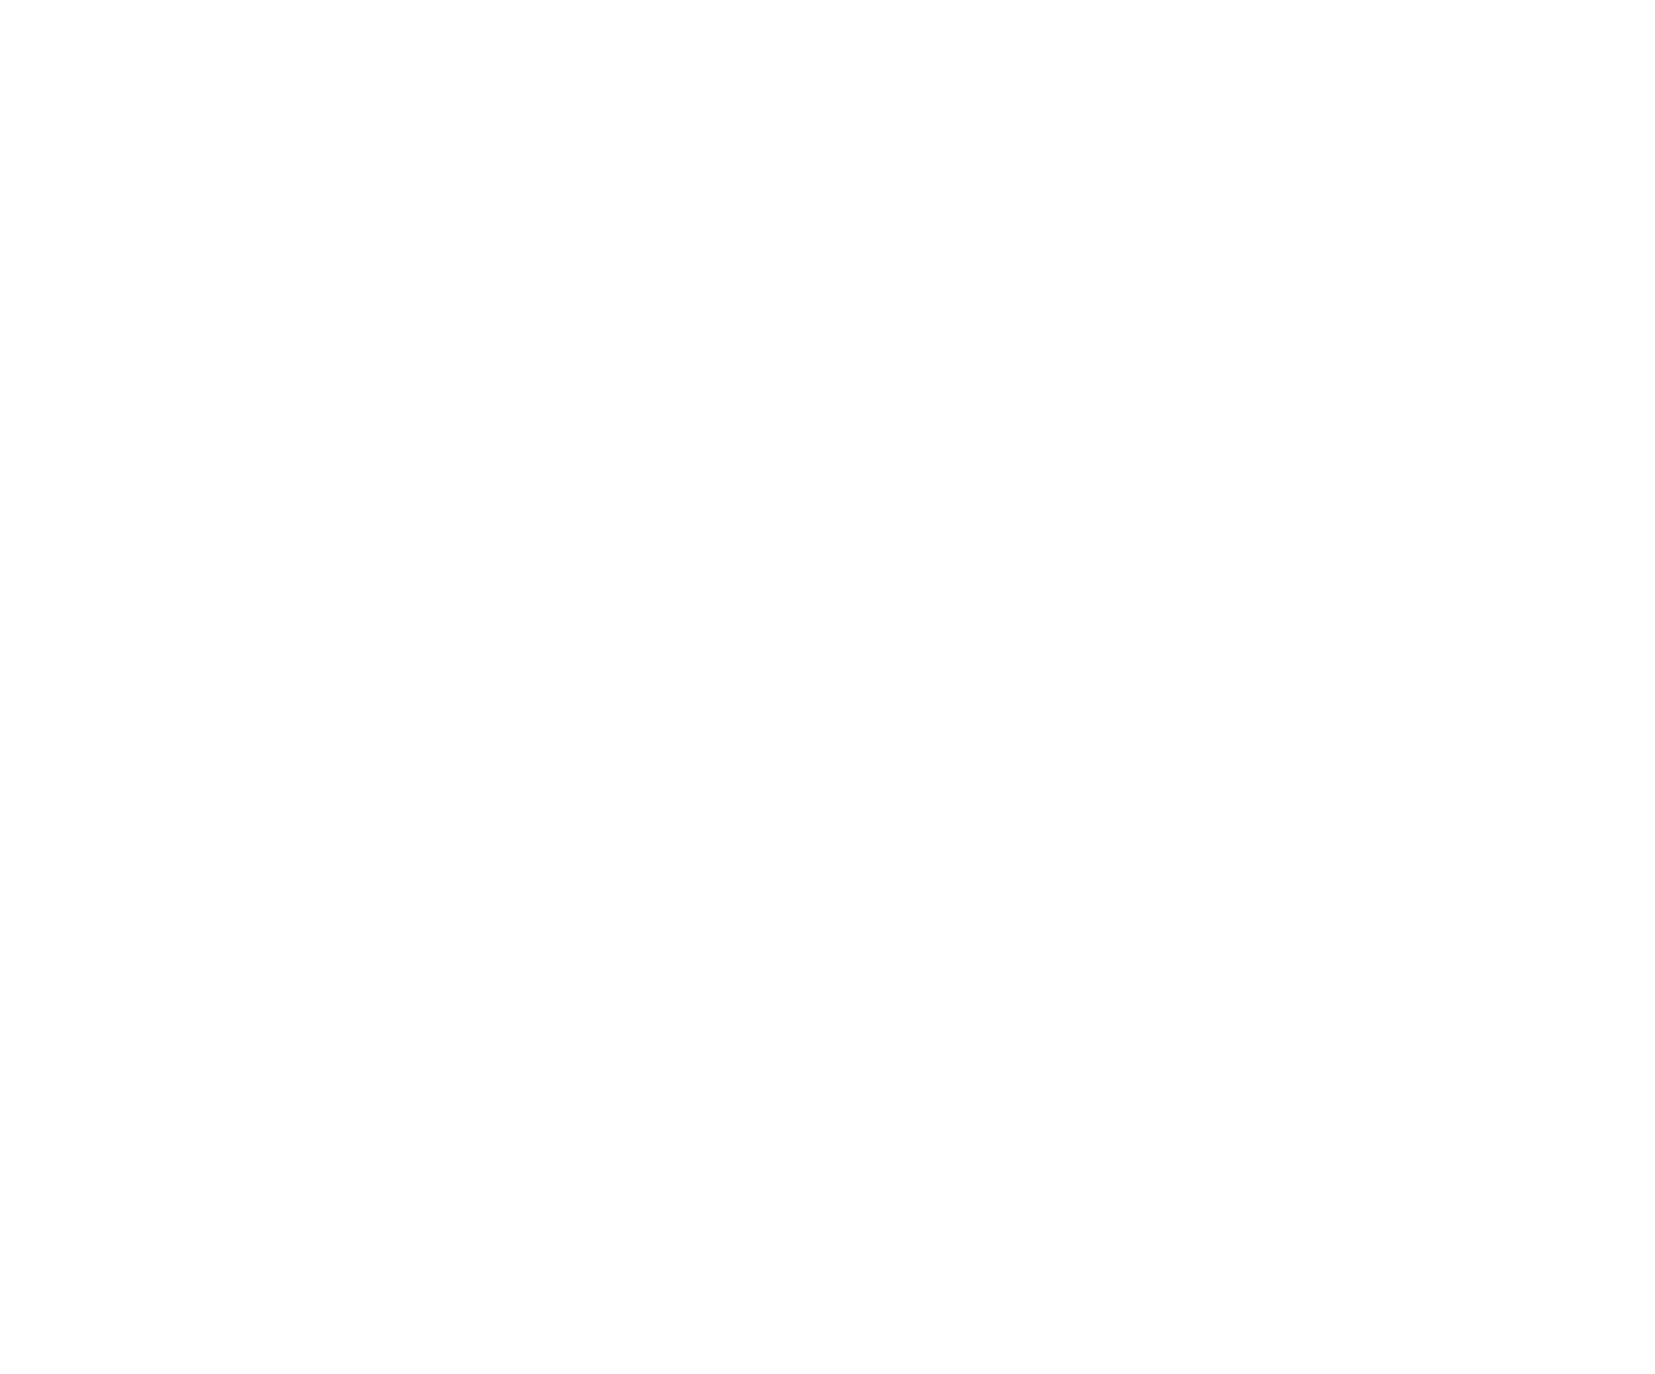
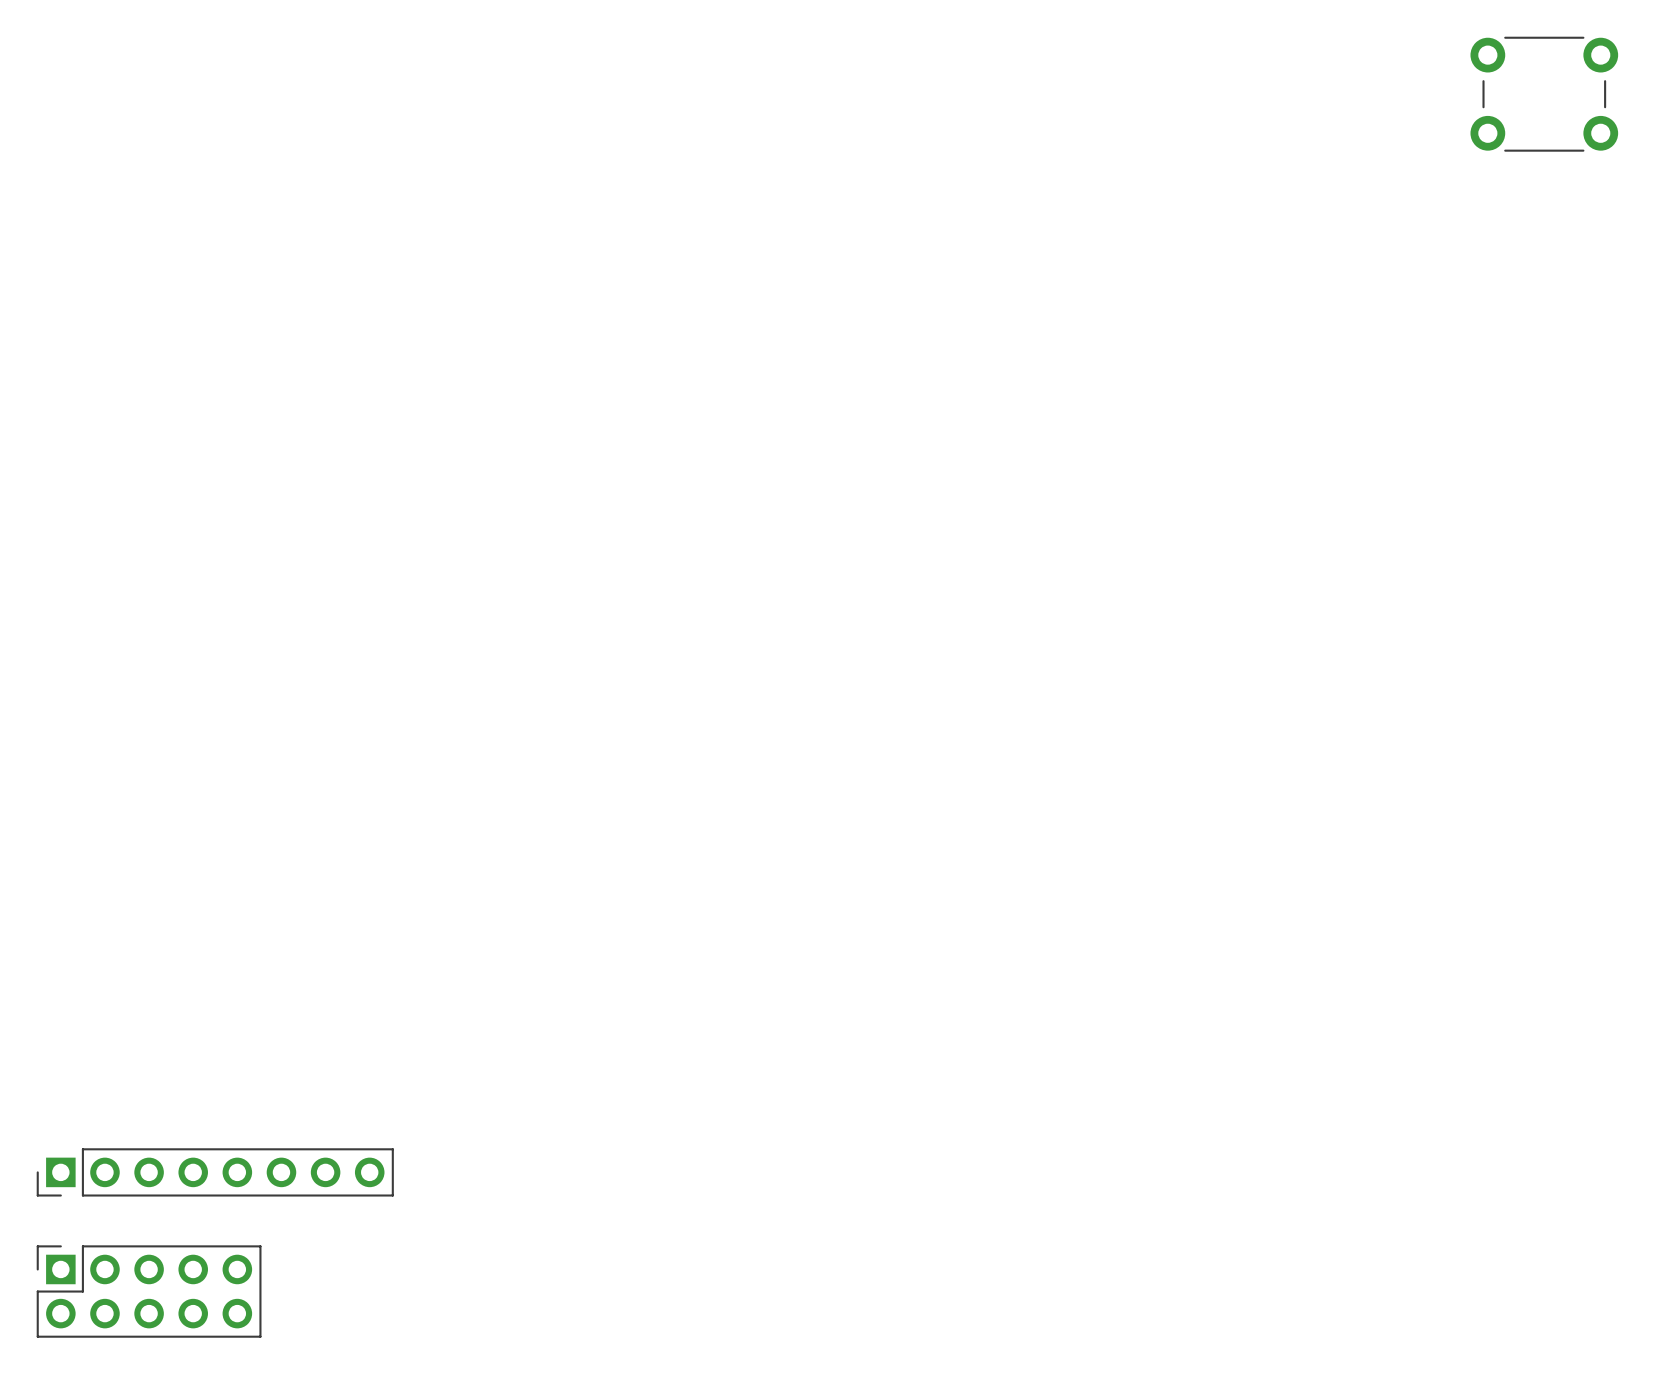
part: none -> (1544, 94)
part: none -> (215, 1172)
part: none -> (149, 1291)

